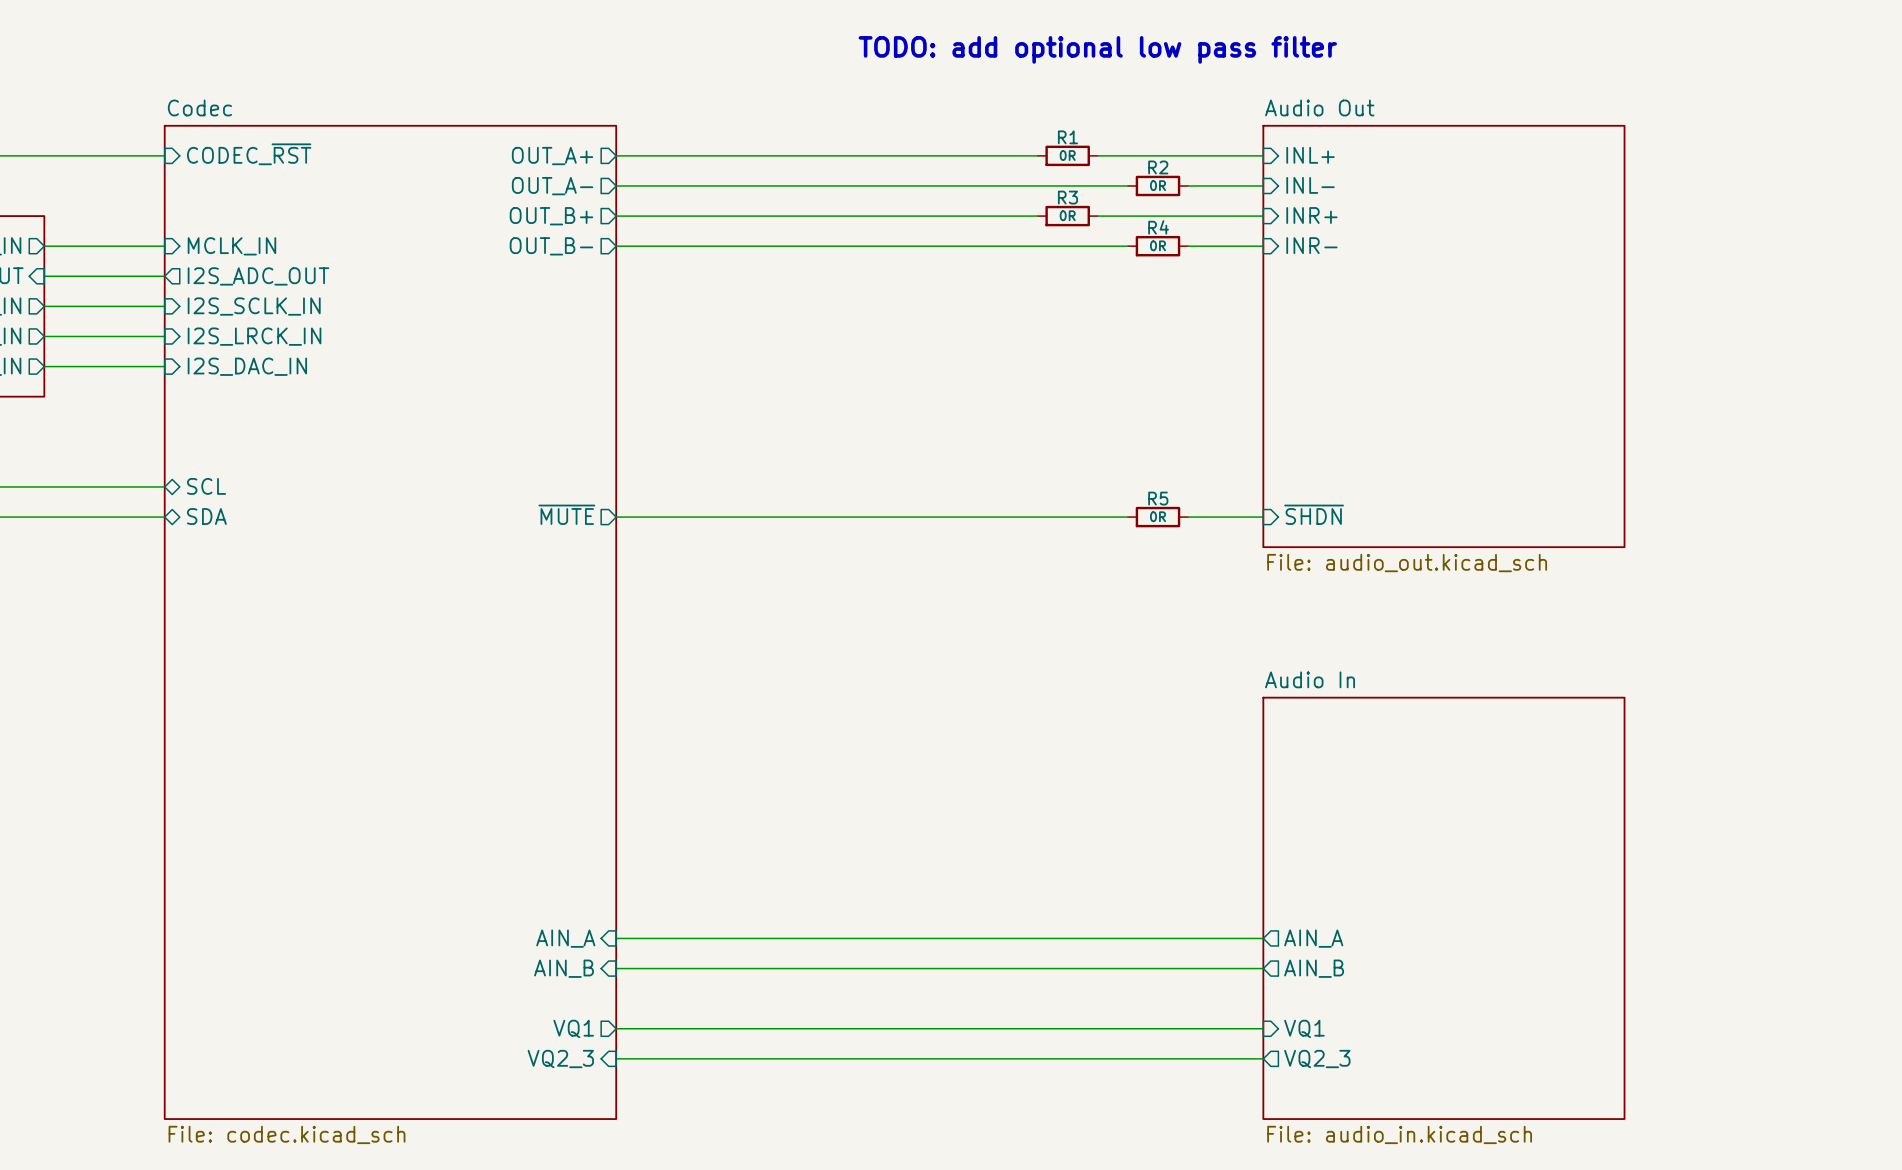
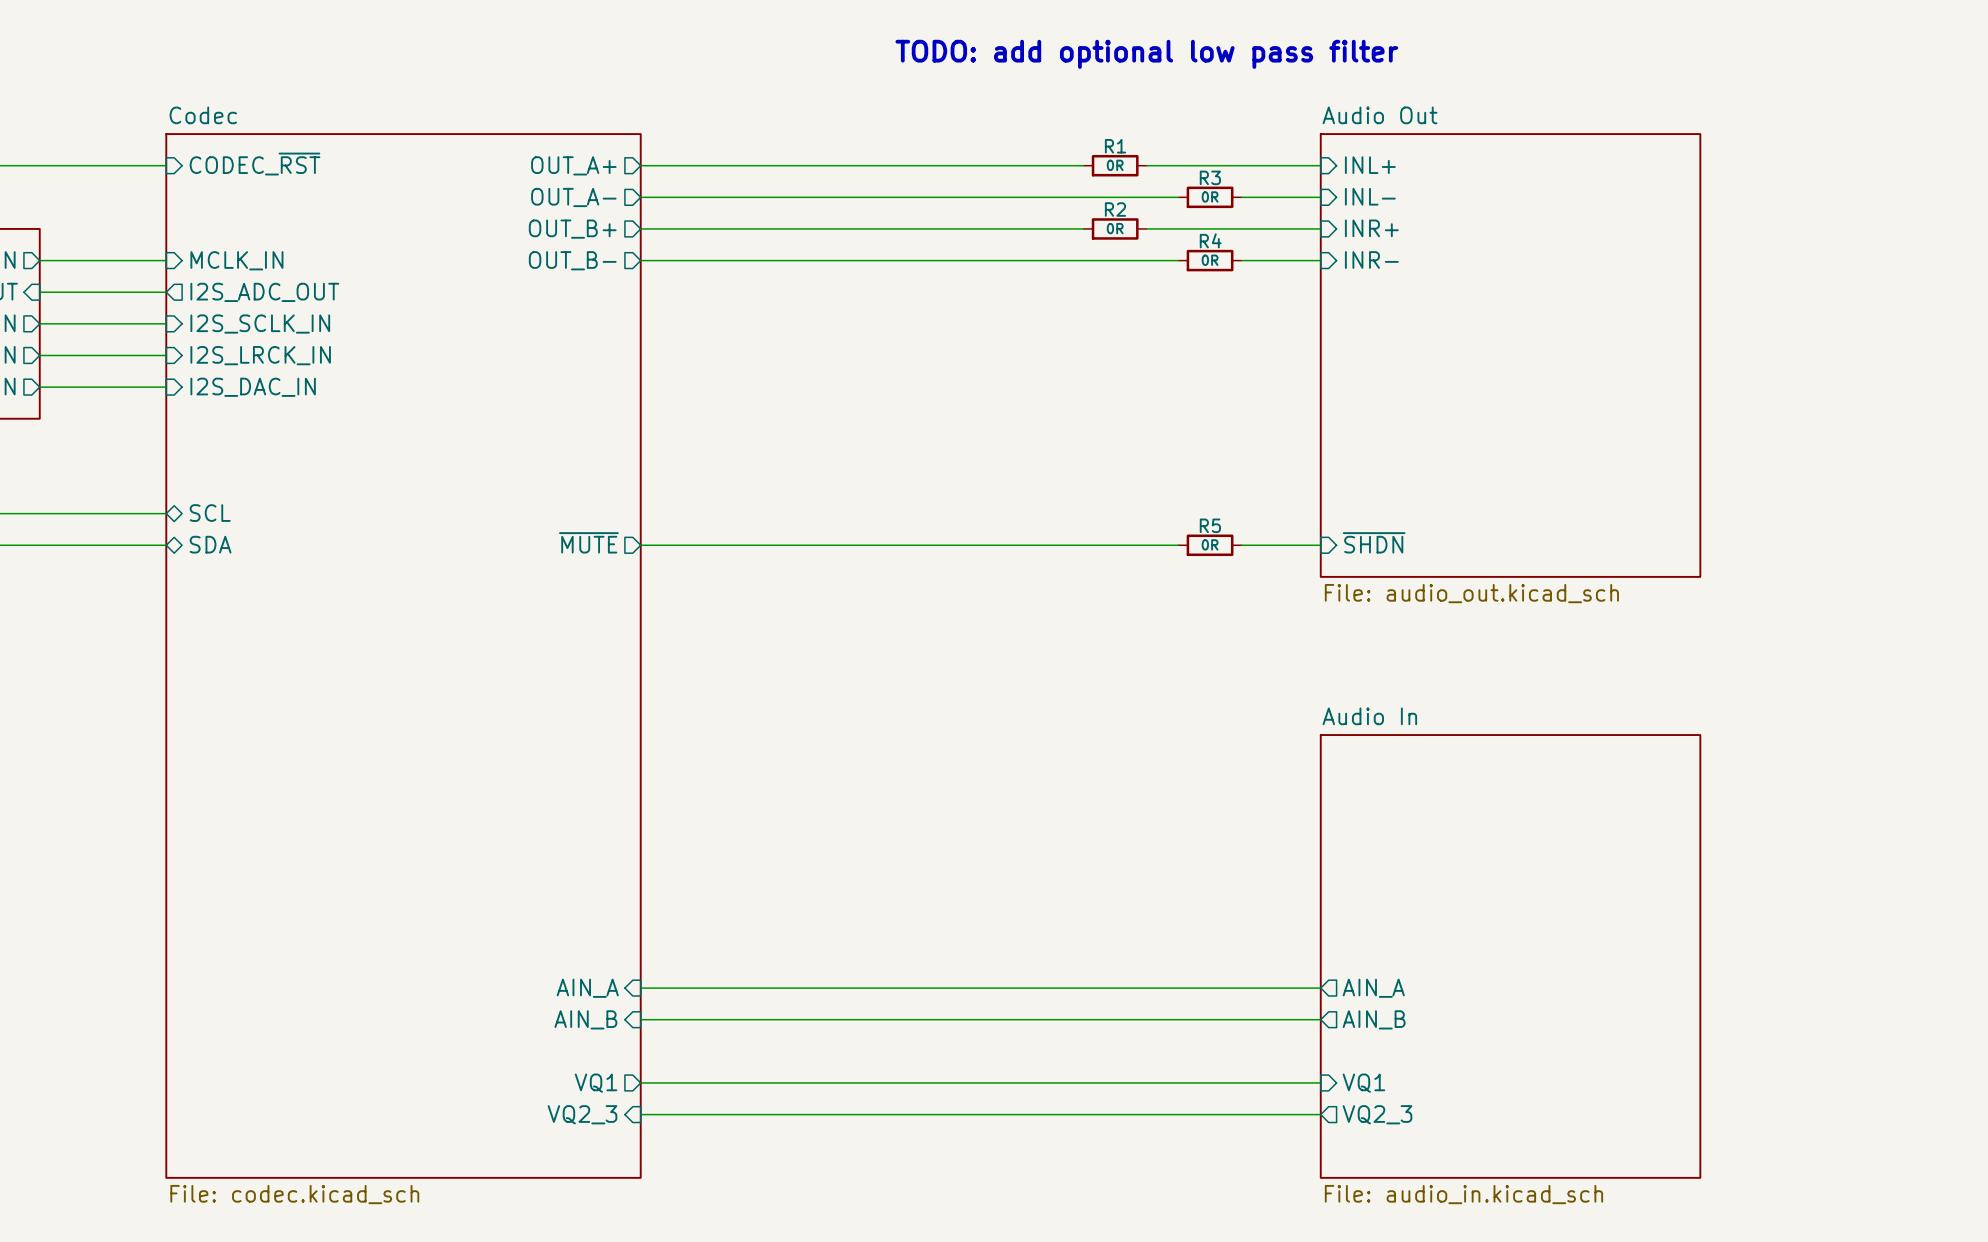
R2 name: R2 (1158, 167) -> R3 (1210, 177)
R3 name: R3 (1067, 197) -> R2 (1115, 209)

